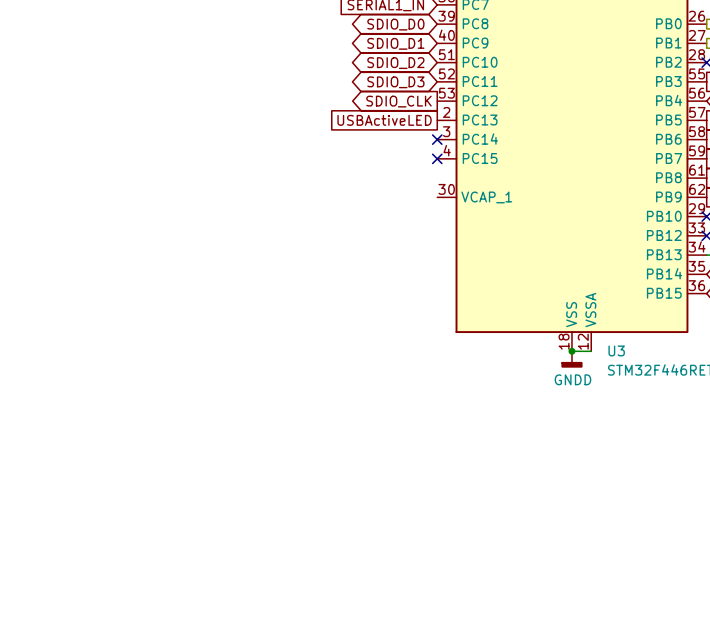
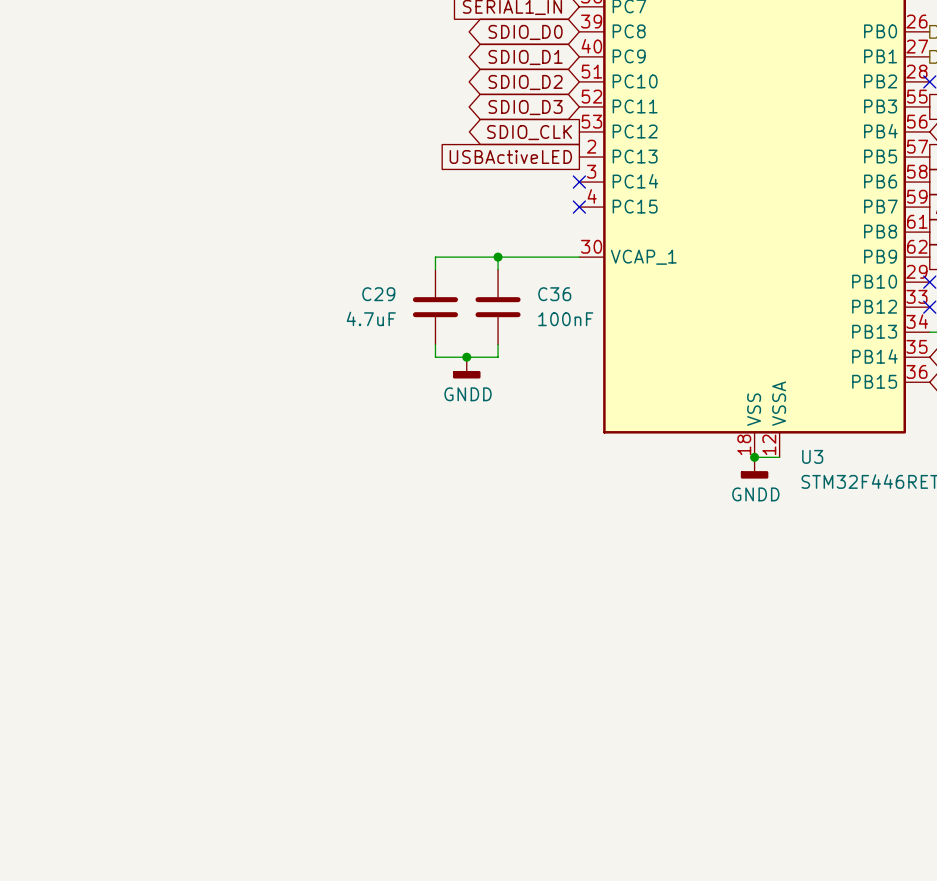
wire: none -> (498, 257) (498, 269)
junction: none -> (498, 257)
wire: none -> (579, 257) (435, 257) (435, 269)
C29: none -> 4.7uF (435, 307)
C36: none -> 100nF (498, 307)
wire: none -> (435, 344) (435, 357) (498, 357) (498, 344)
junction: none -> (466, 357)
power symbol: none -> GNDD (466, 367)

